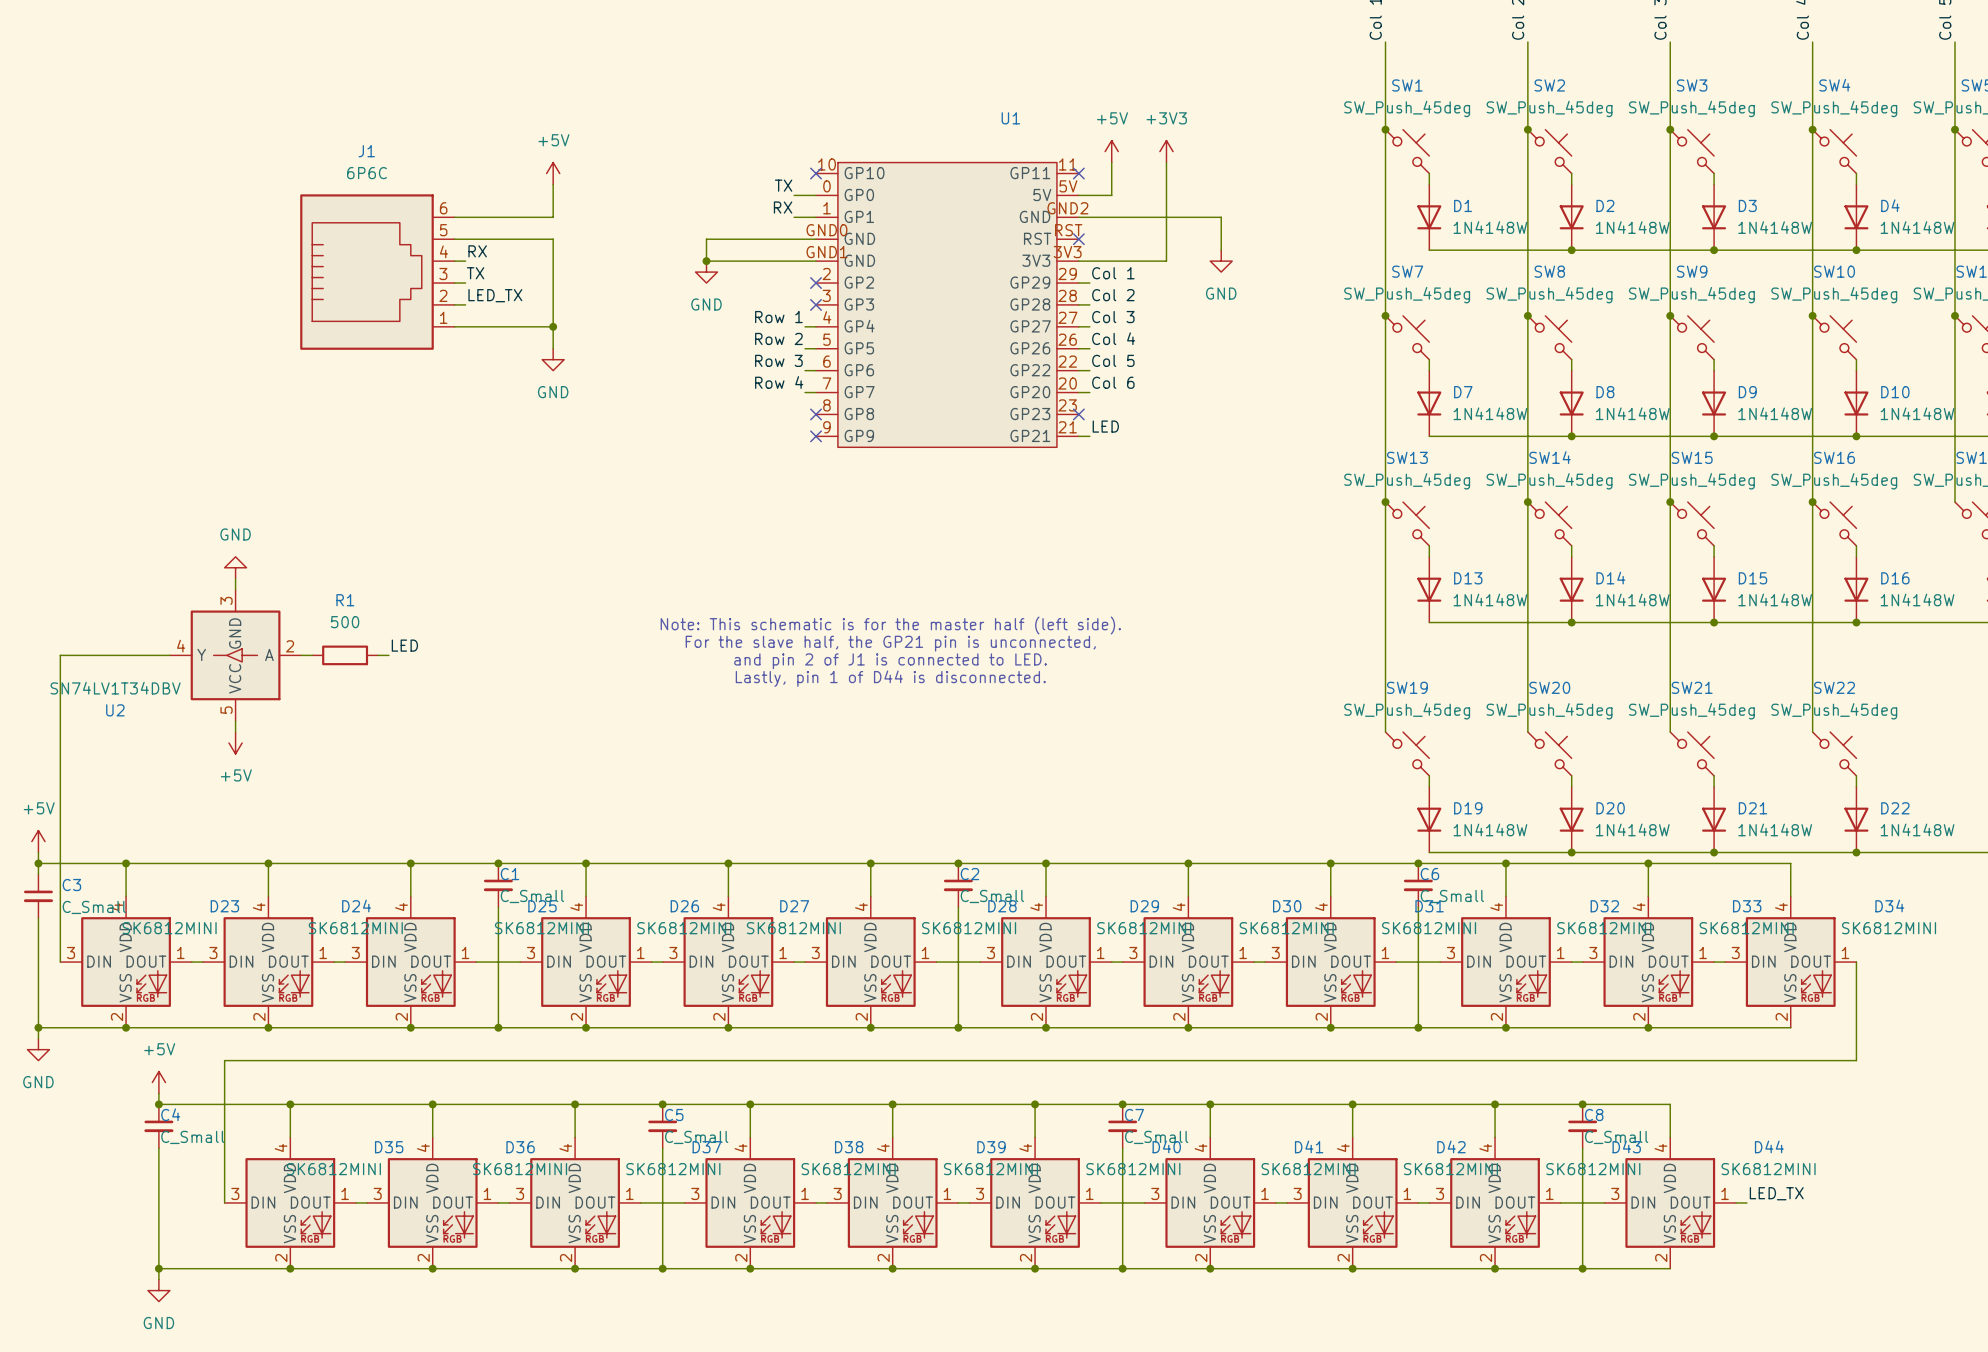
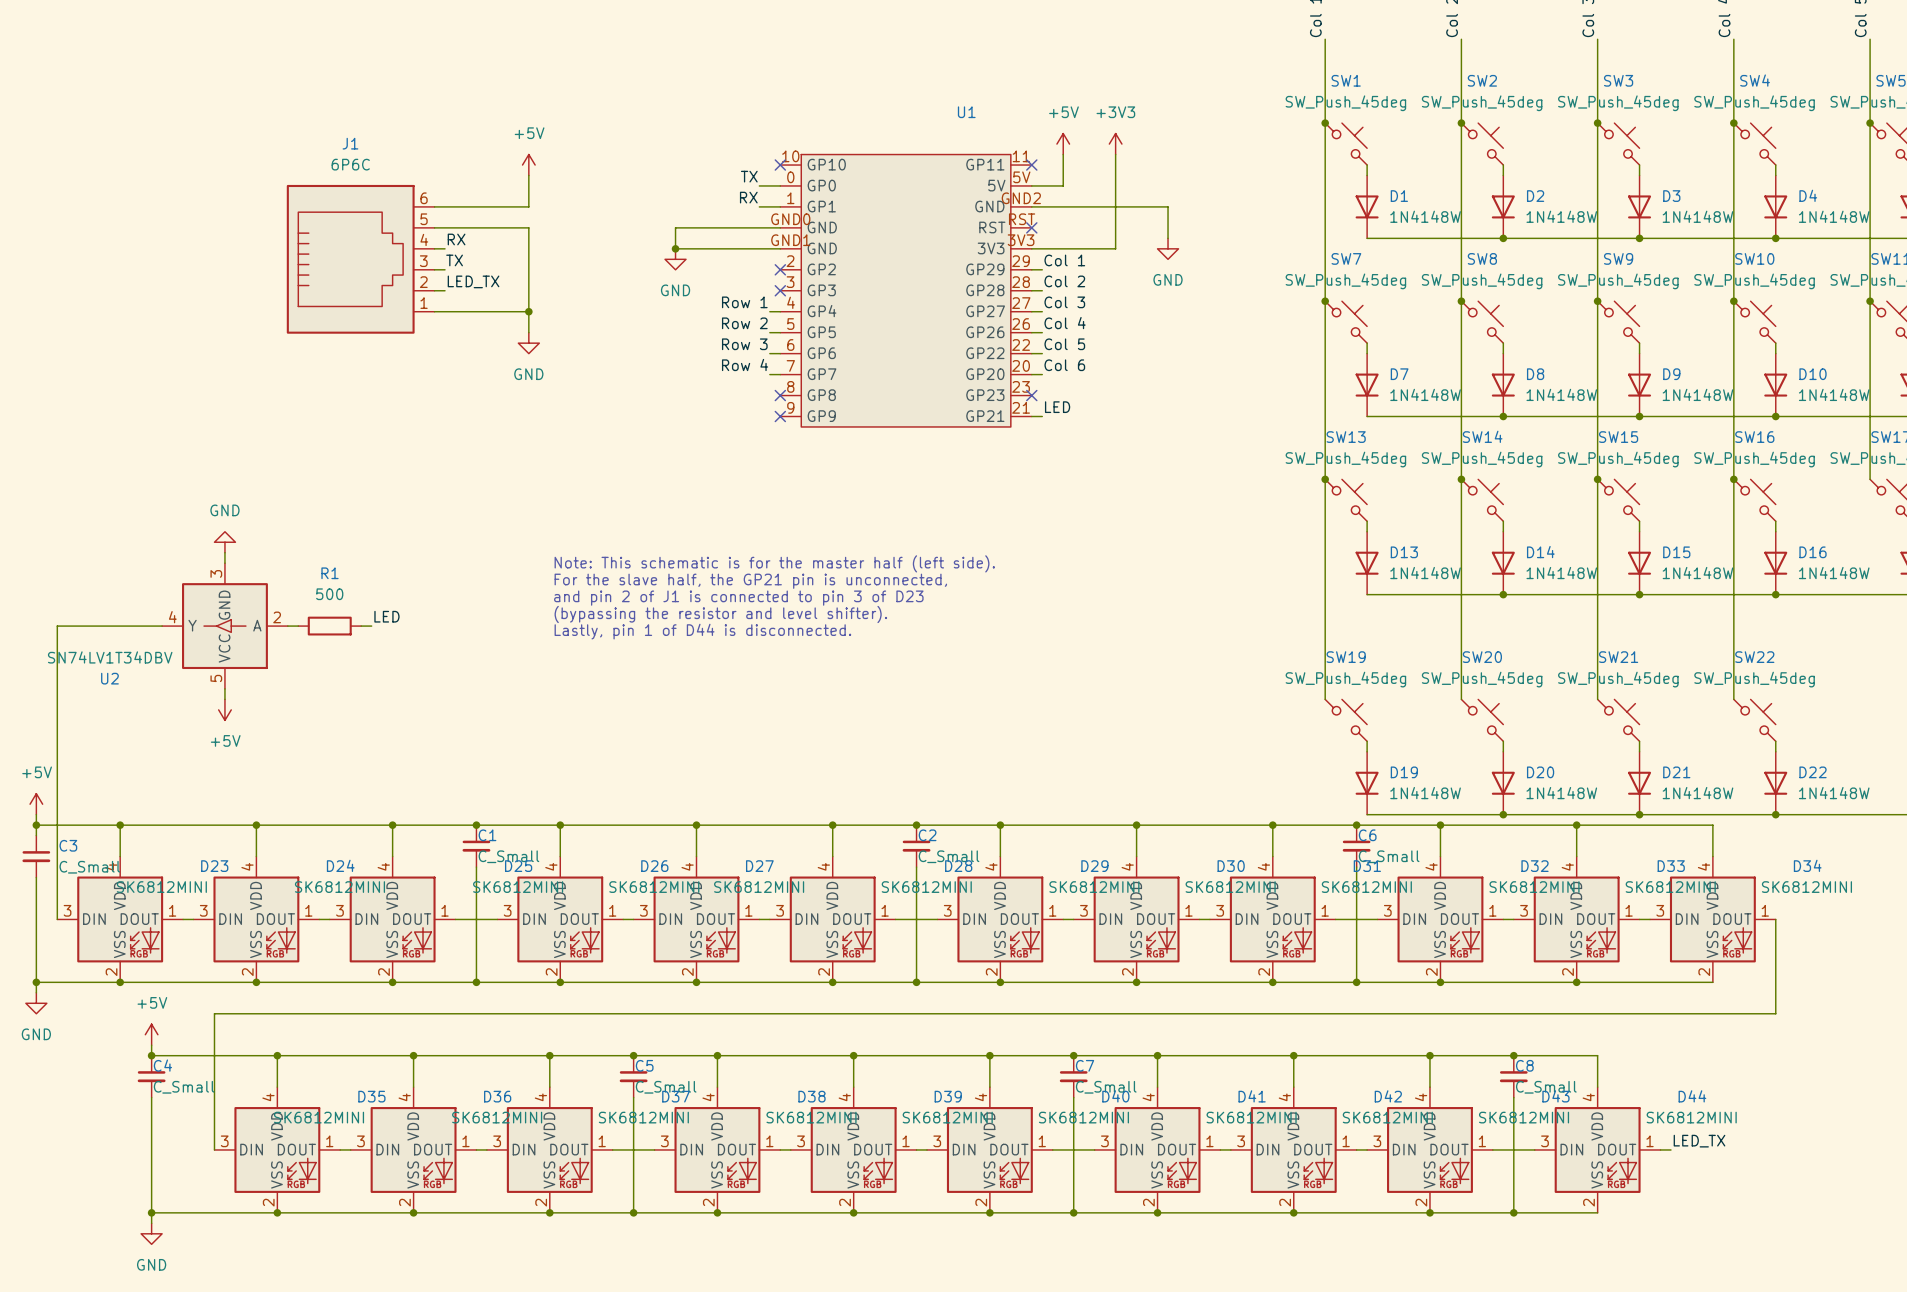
text: none -> Note: This schematic is for the master half (left side). (774, 563)
text: none -> For the slave half, the GP21 pin is unconnected, (750, 581)
text: Note: This schematic is for the master half (left side). (890, 625) -> none
text: none -> and pin 2 of J1 is connected to pin 3 of D23 (738, 598)
text: none -> (bypassing the resistor and level shifter). (720, 614)
text: For the slave half, the GP21 pin is unconnected, (890, 643) -> none
text: none -> Lastly, pin 1 of D44 is disconnected. (702, 631)
text: and pin 2 of J1 is connected to LED. (890, 661) -> none
text: Lastly, pin 1 of D44 is disconnected. (890, 678) -> none

